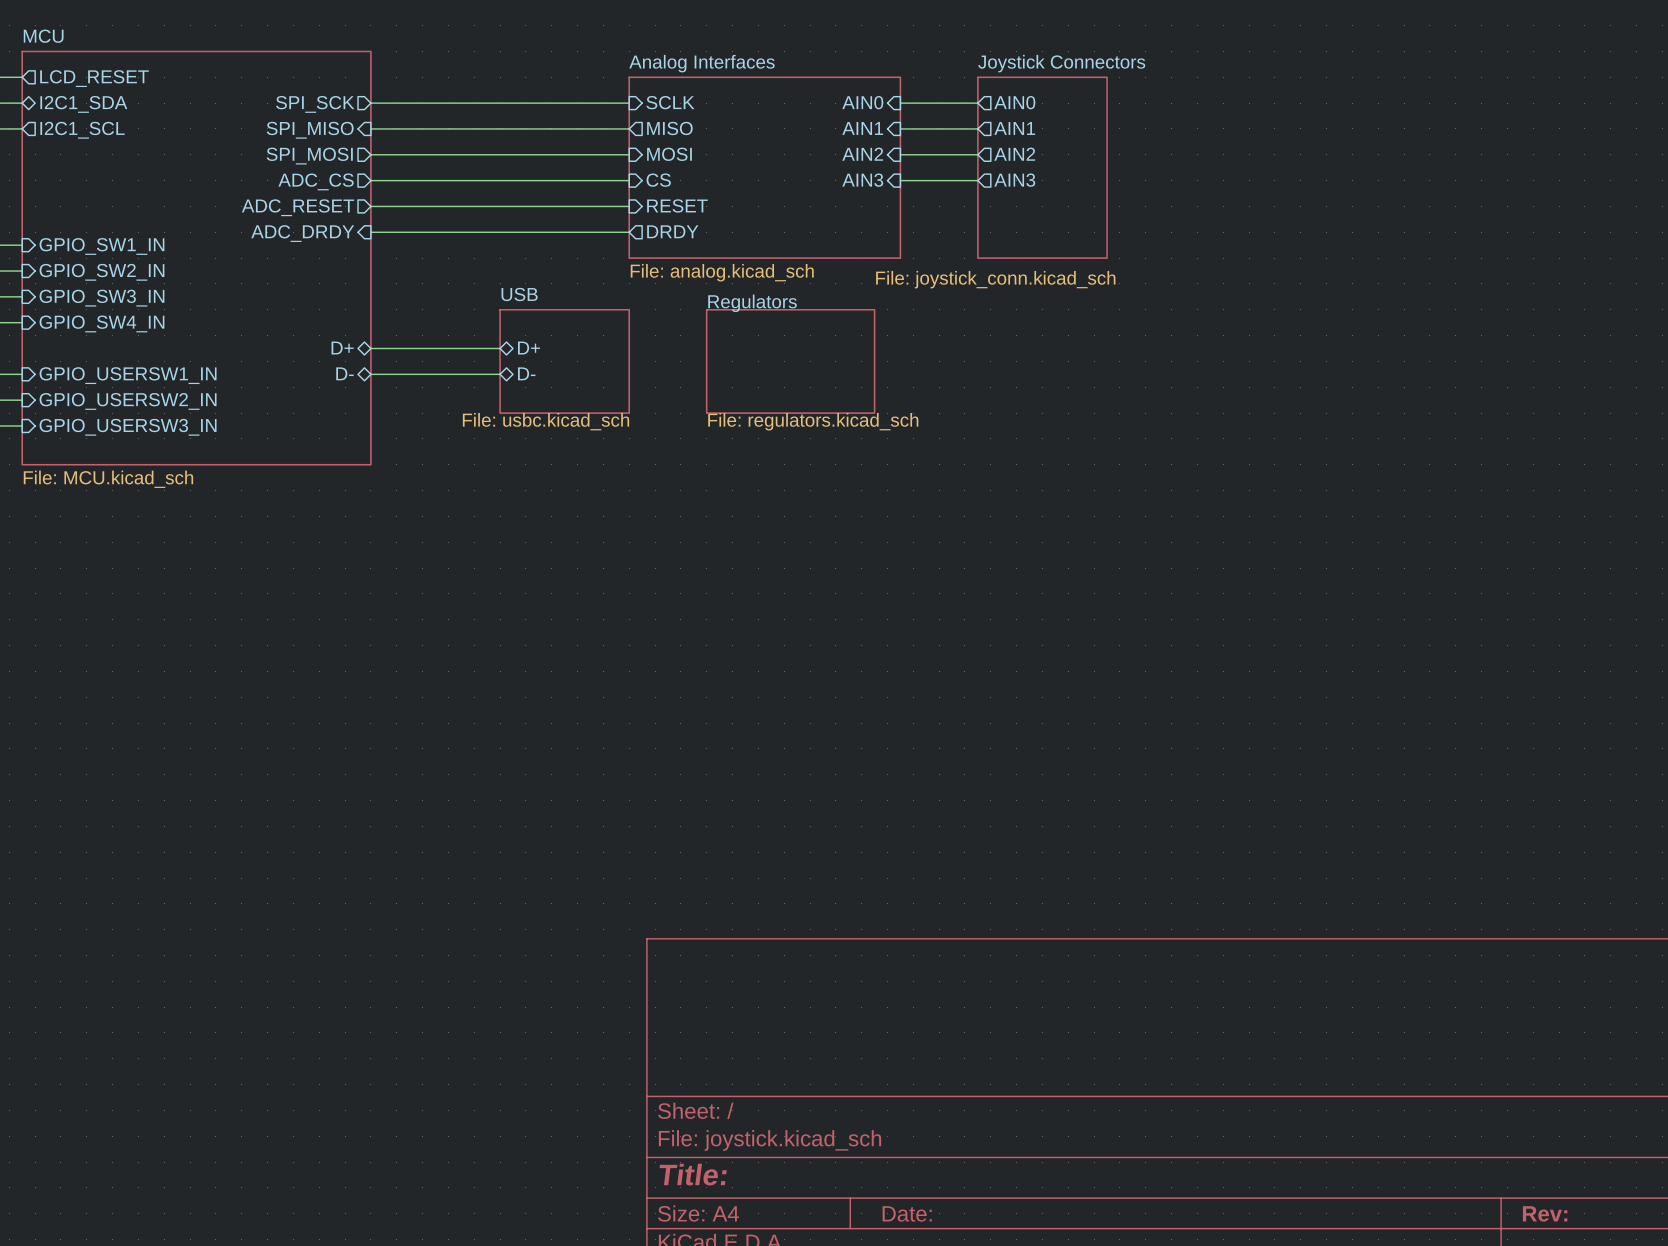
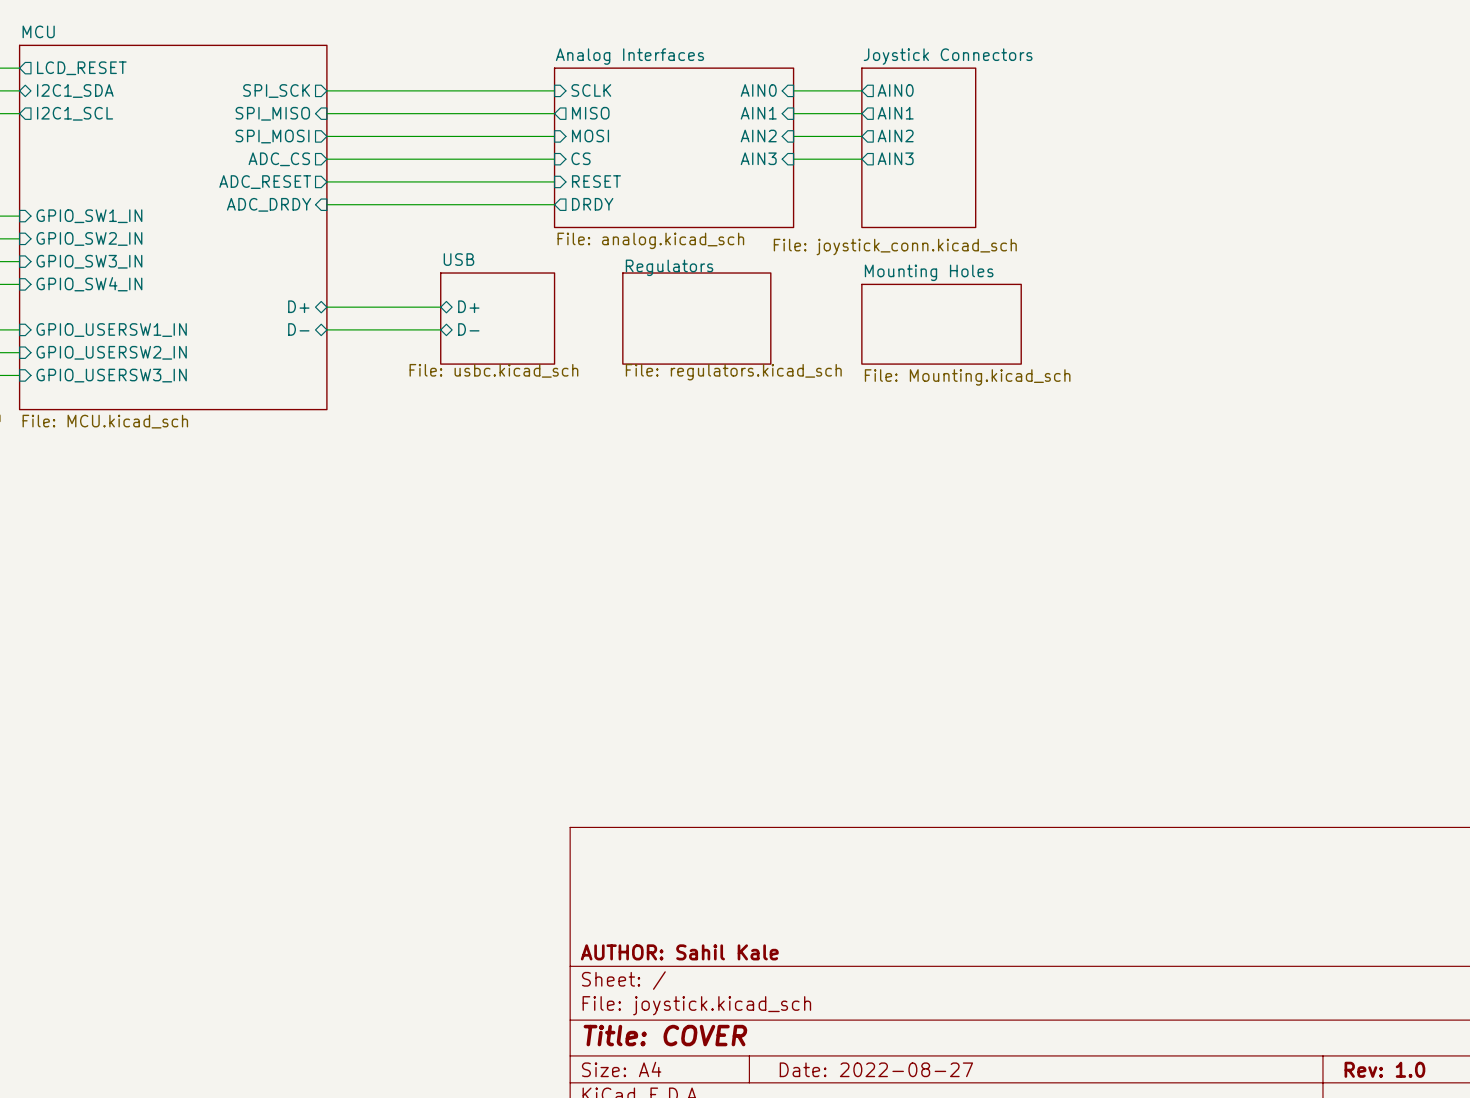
sheet Mounting Holes: none -> File: Mounting.kicad_sch (941, 324)
title block: none -> AUTHOR: Sahil Kale (679, 952)
title block: Title: (693, 1174) -> Title: COVER (665, 1035)
title block: Date: (907, 1213) -> Date: 2022-08-27 (876, 1069)
title block: Rev: (1545, 1213) -> Rev: 1.0 (1384, 1069)

